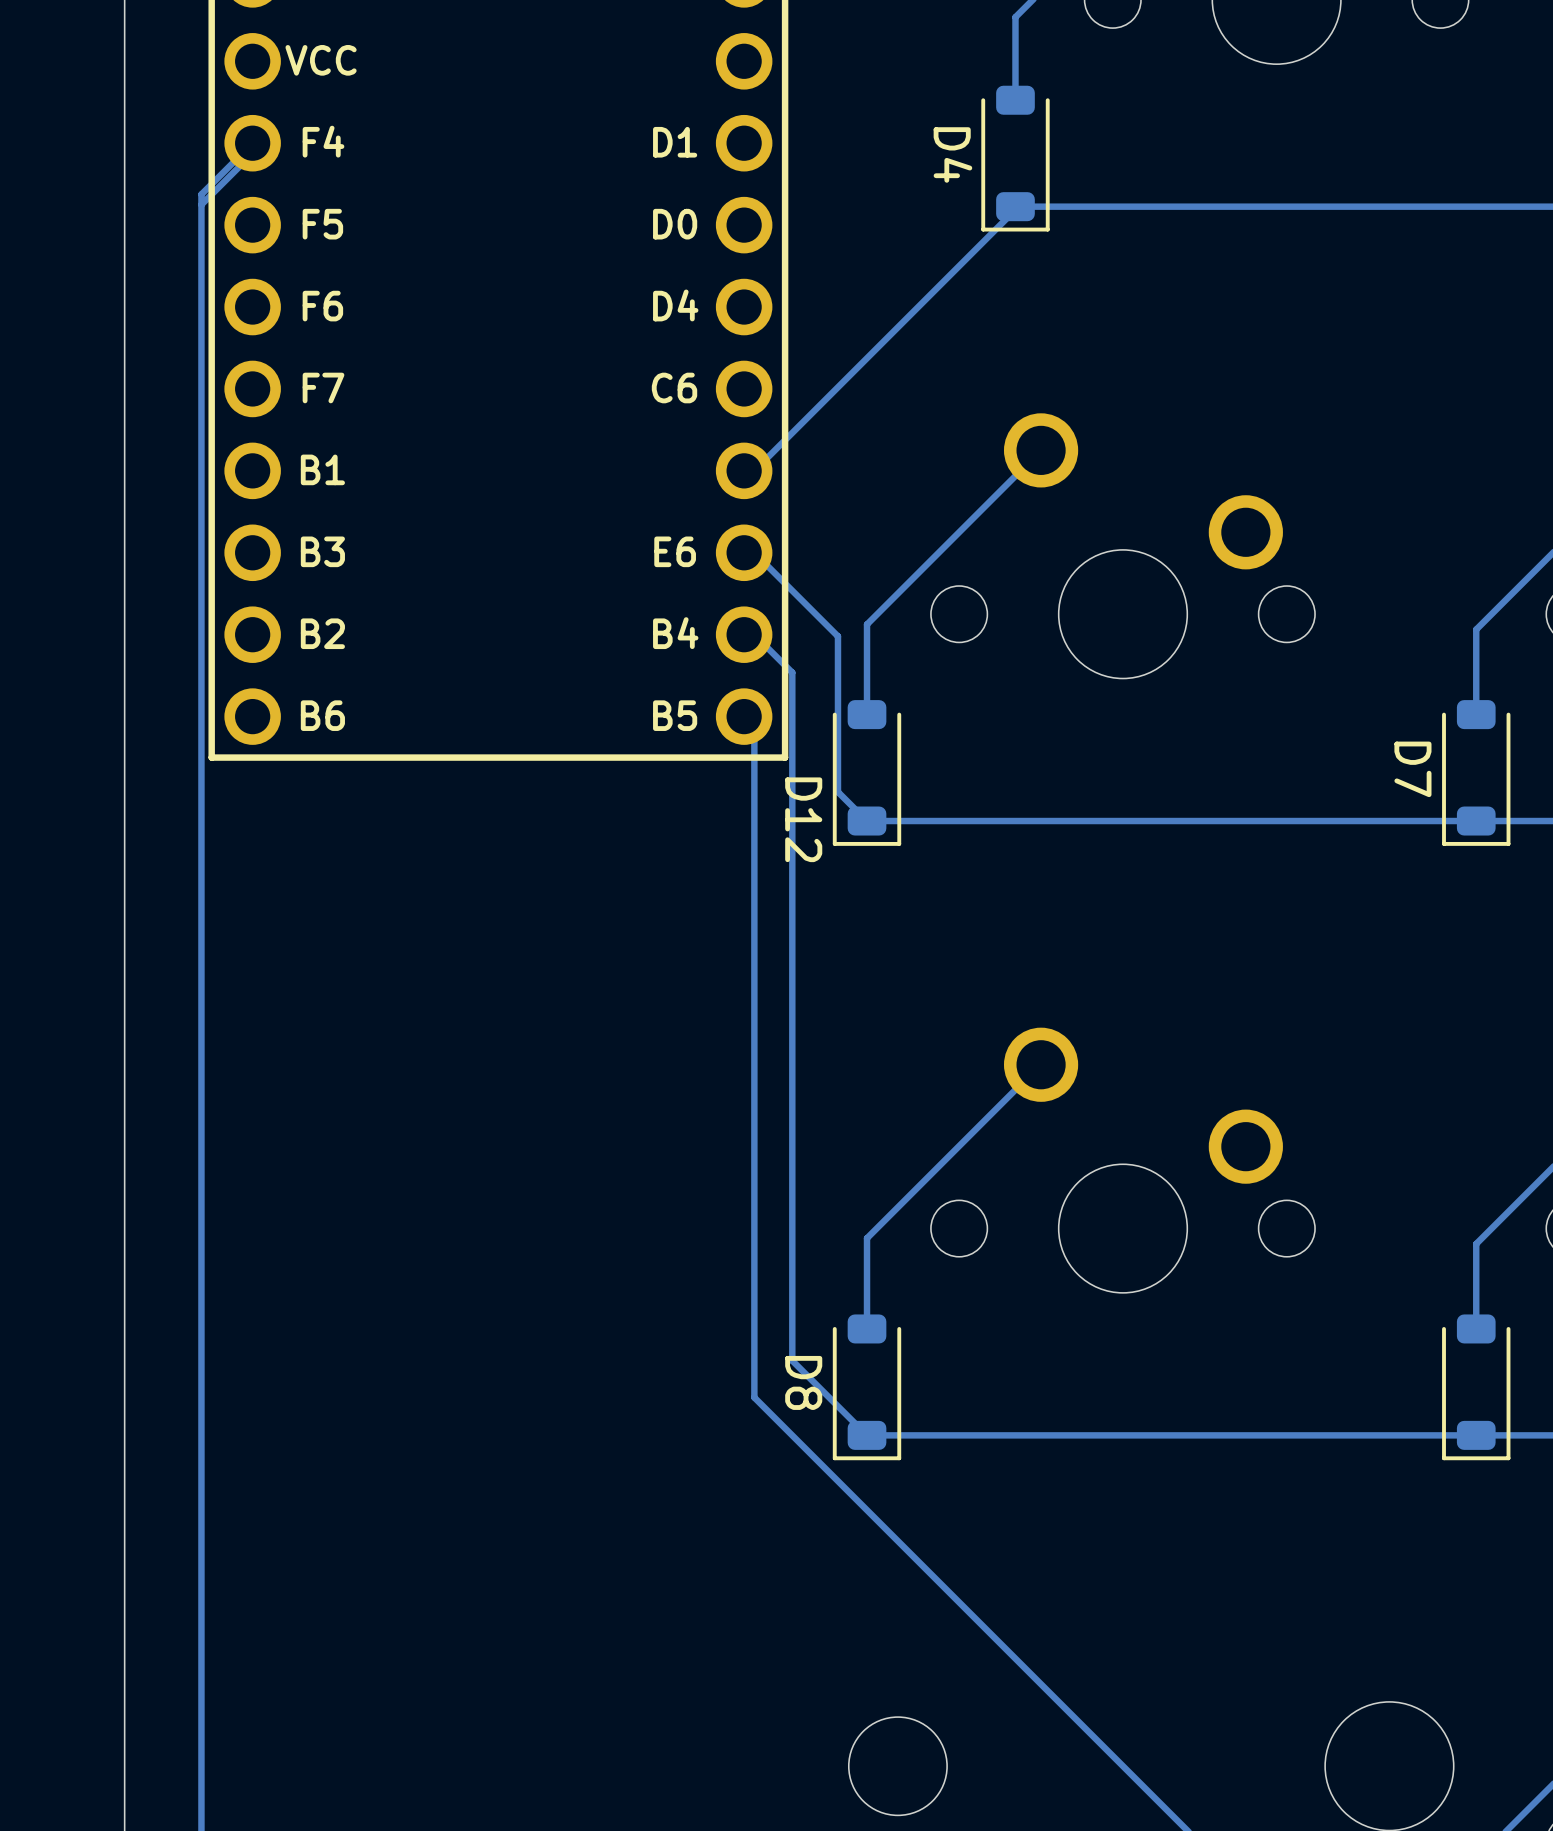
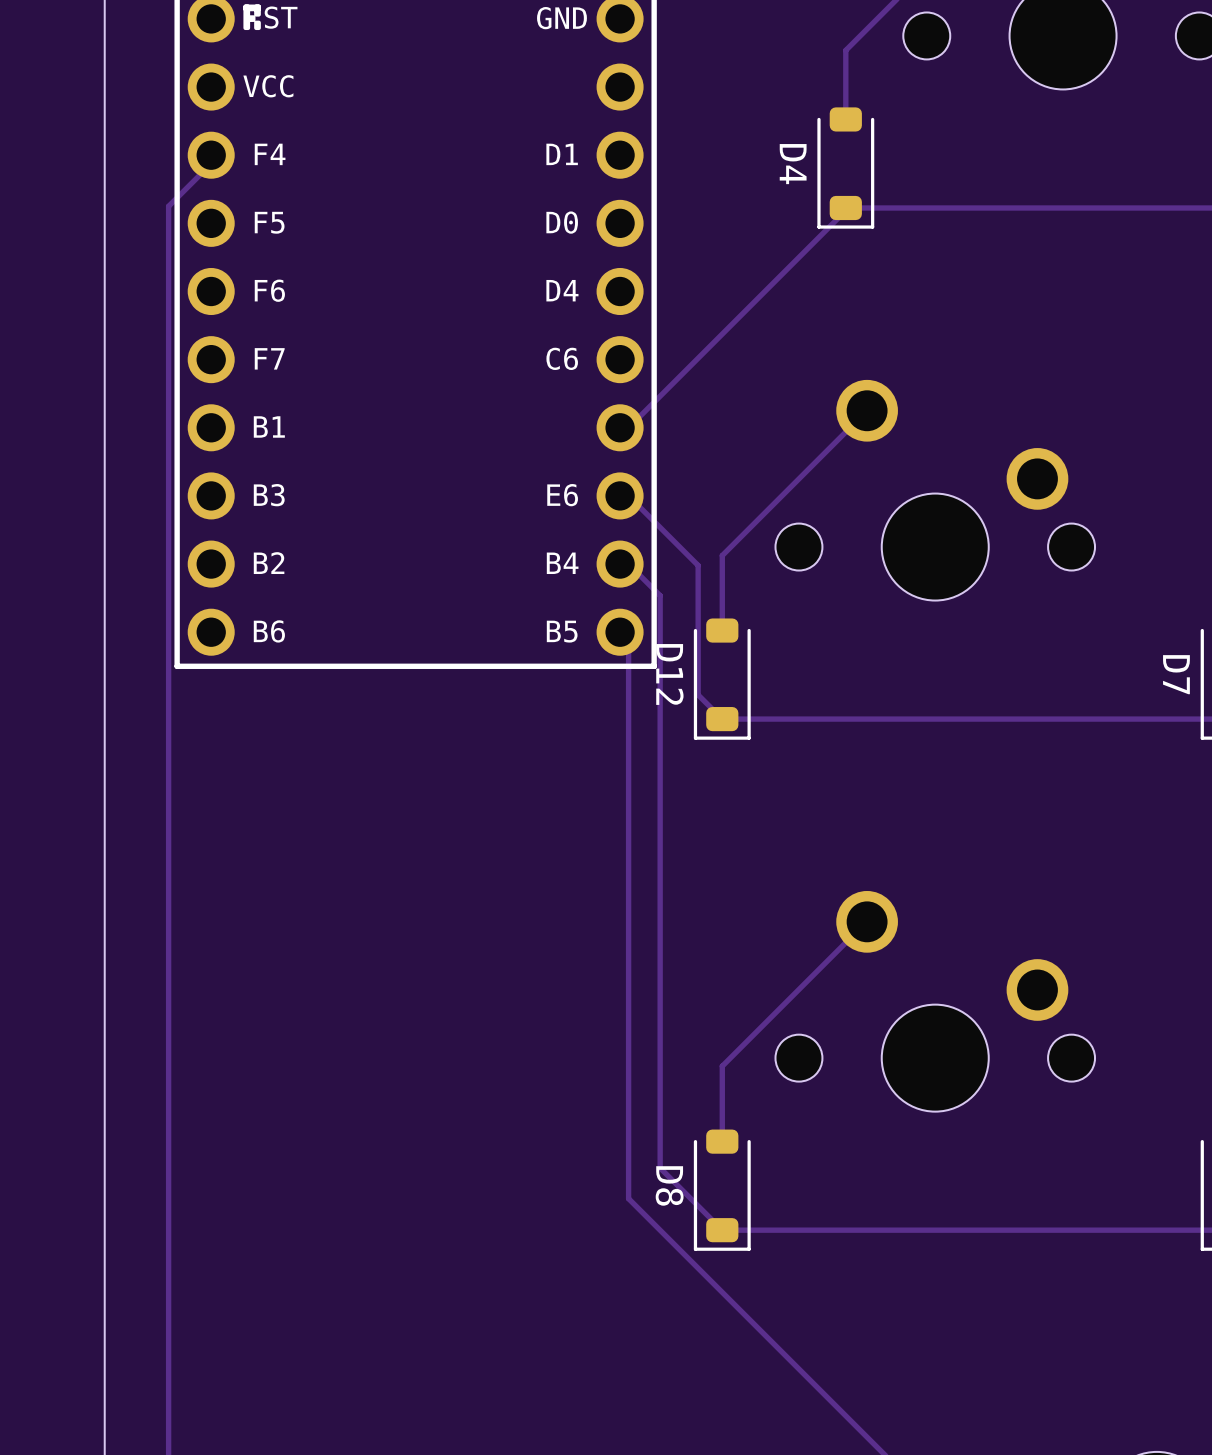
track: (252, 143) (201, 194) (201, 204) -> none
D12 name position: D12 (803, 819) -> D12 (669, 674)

